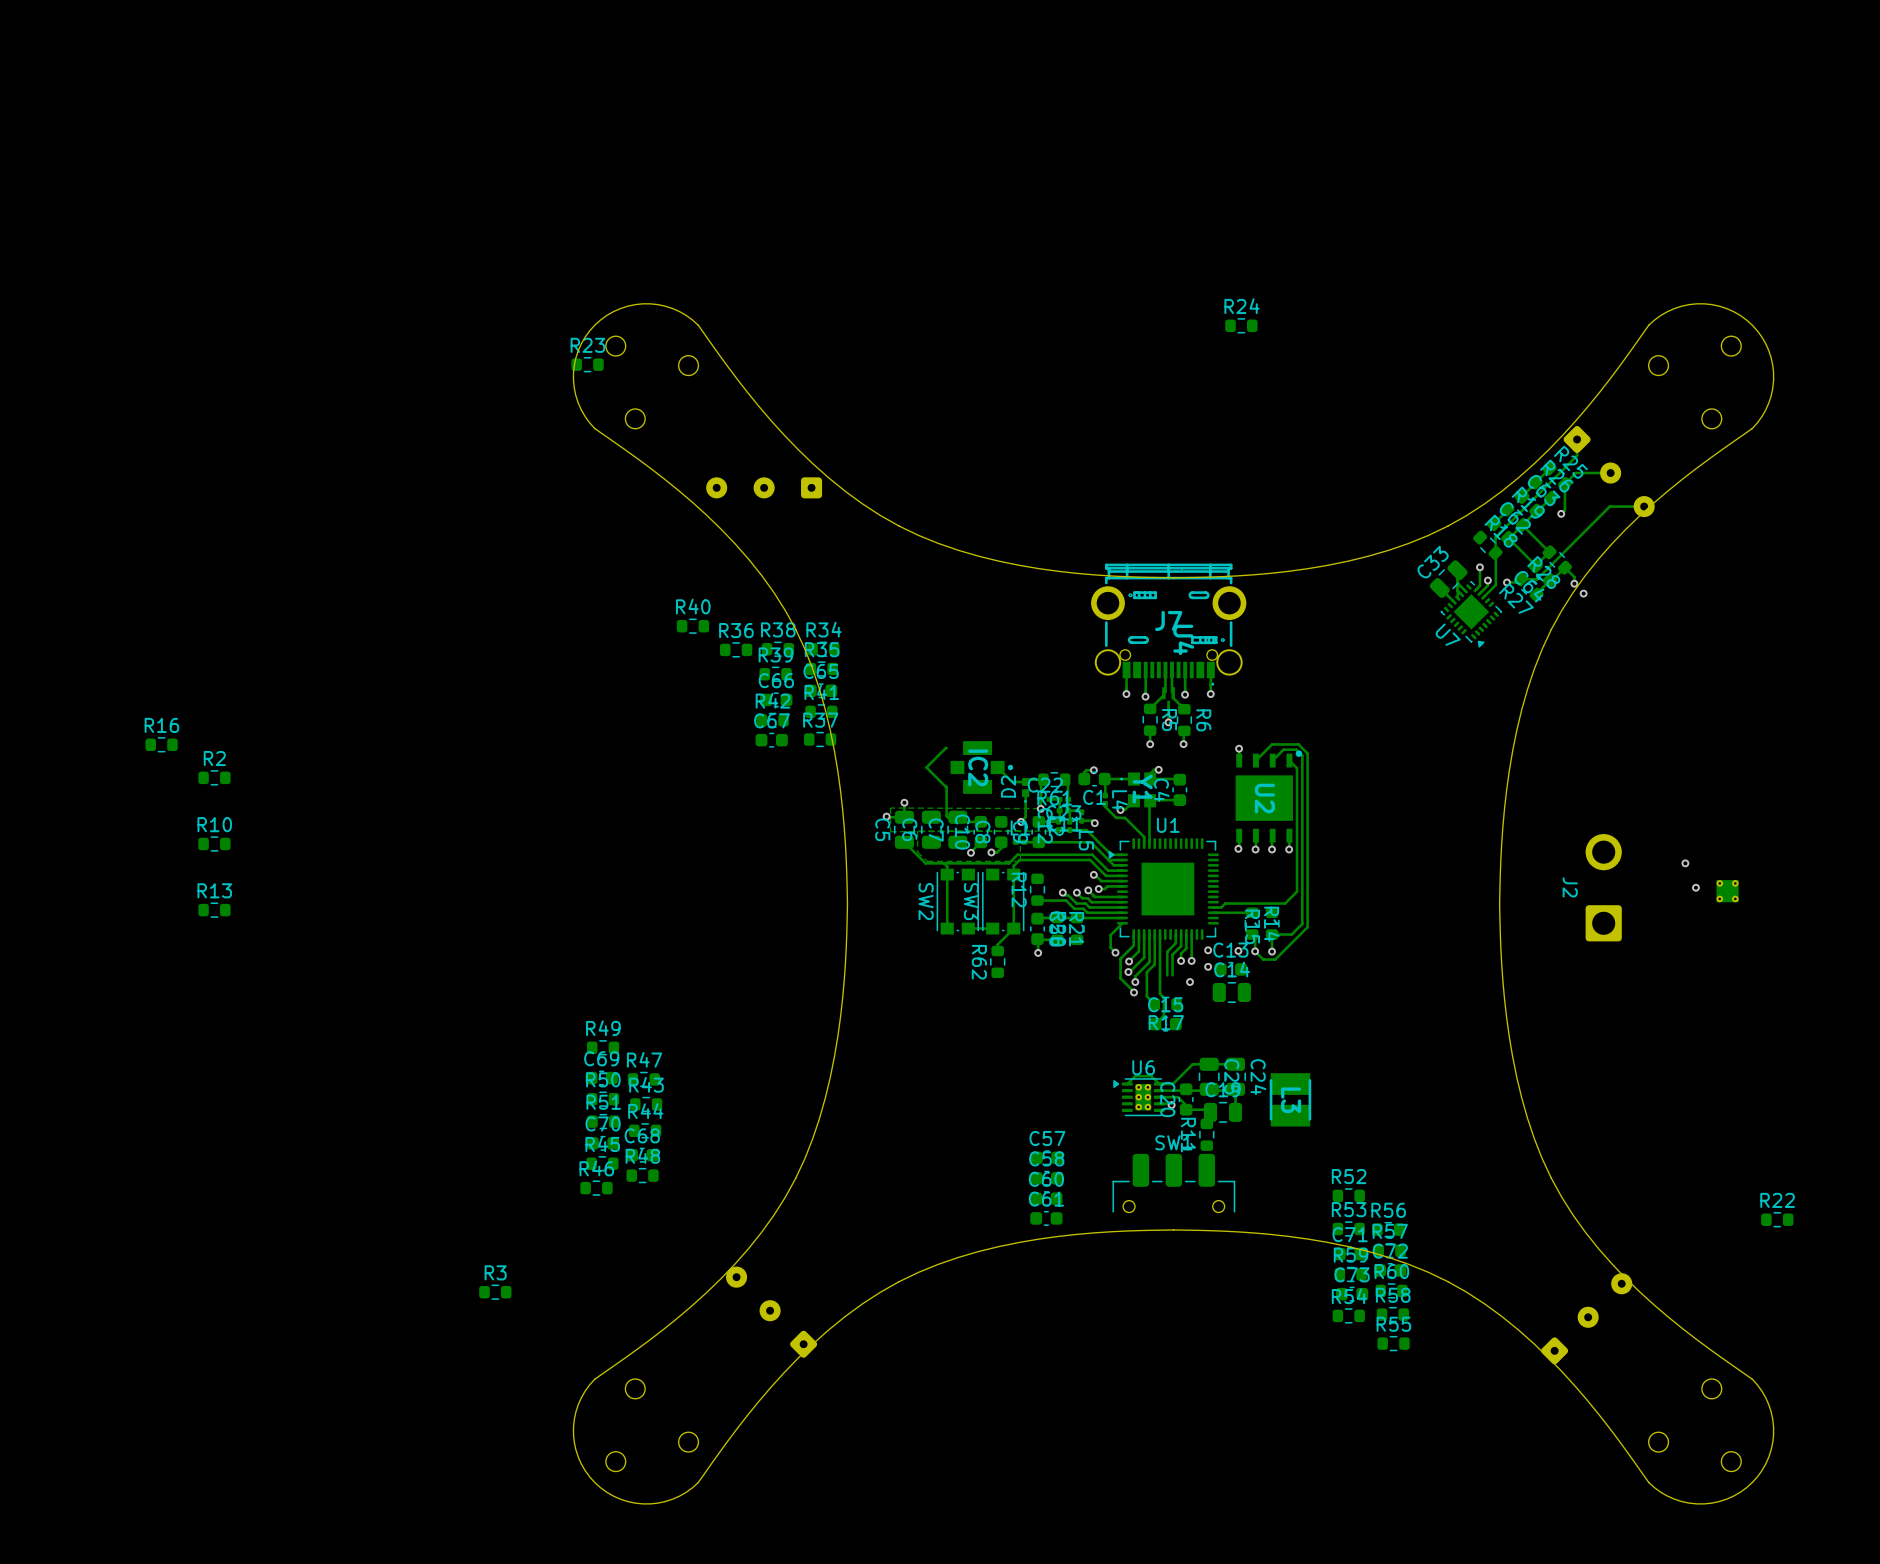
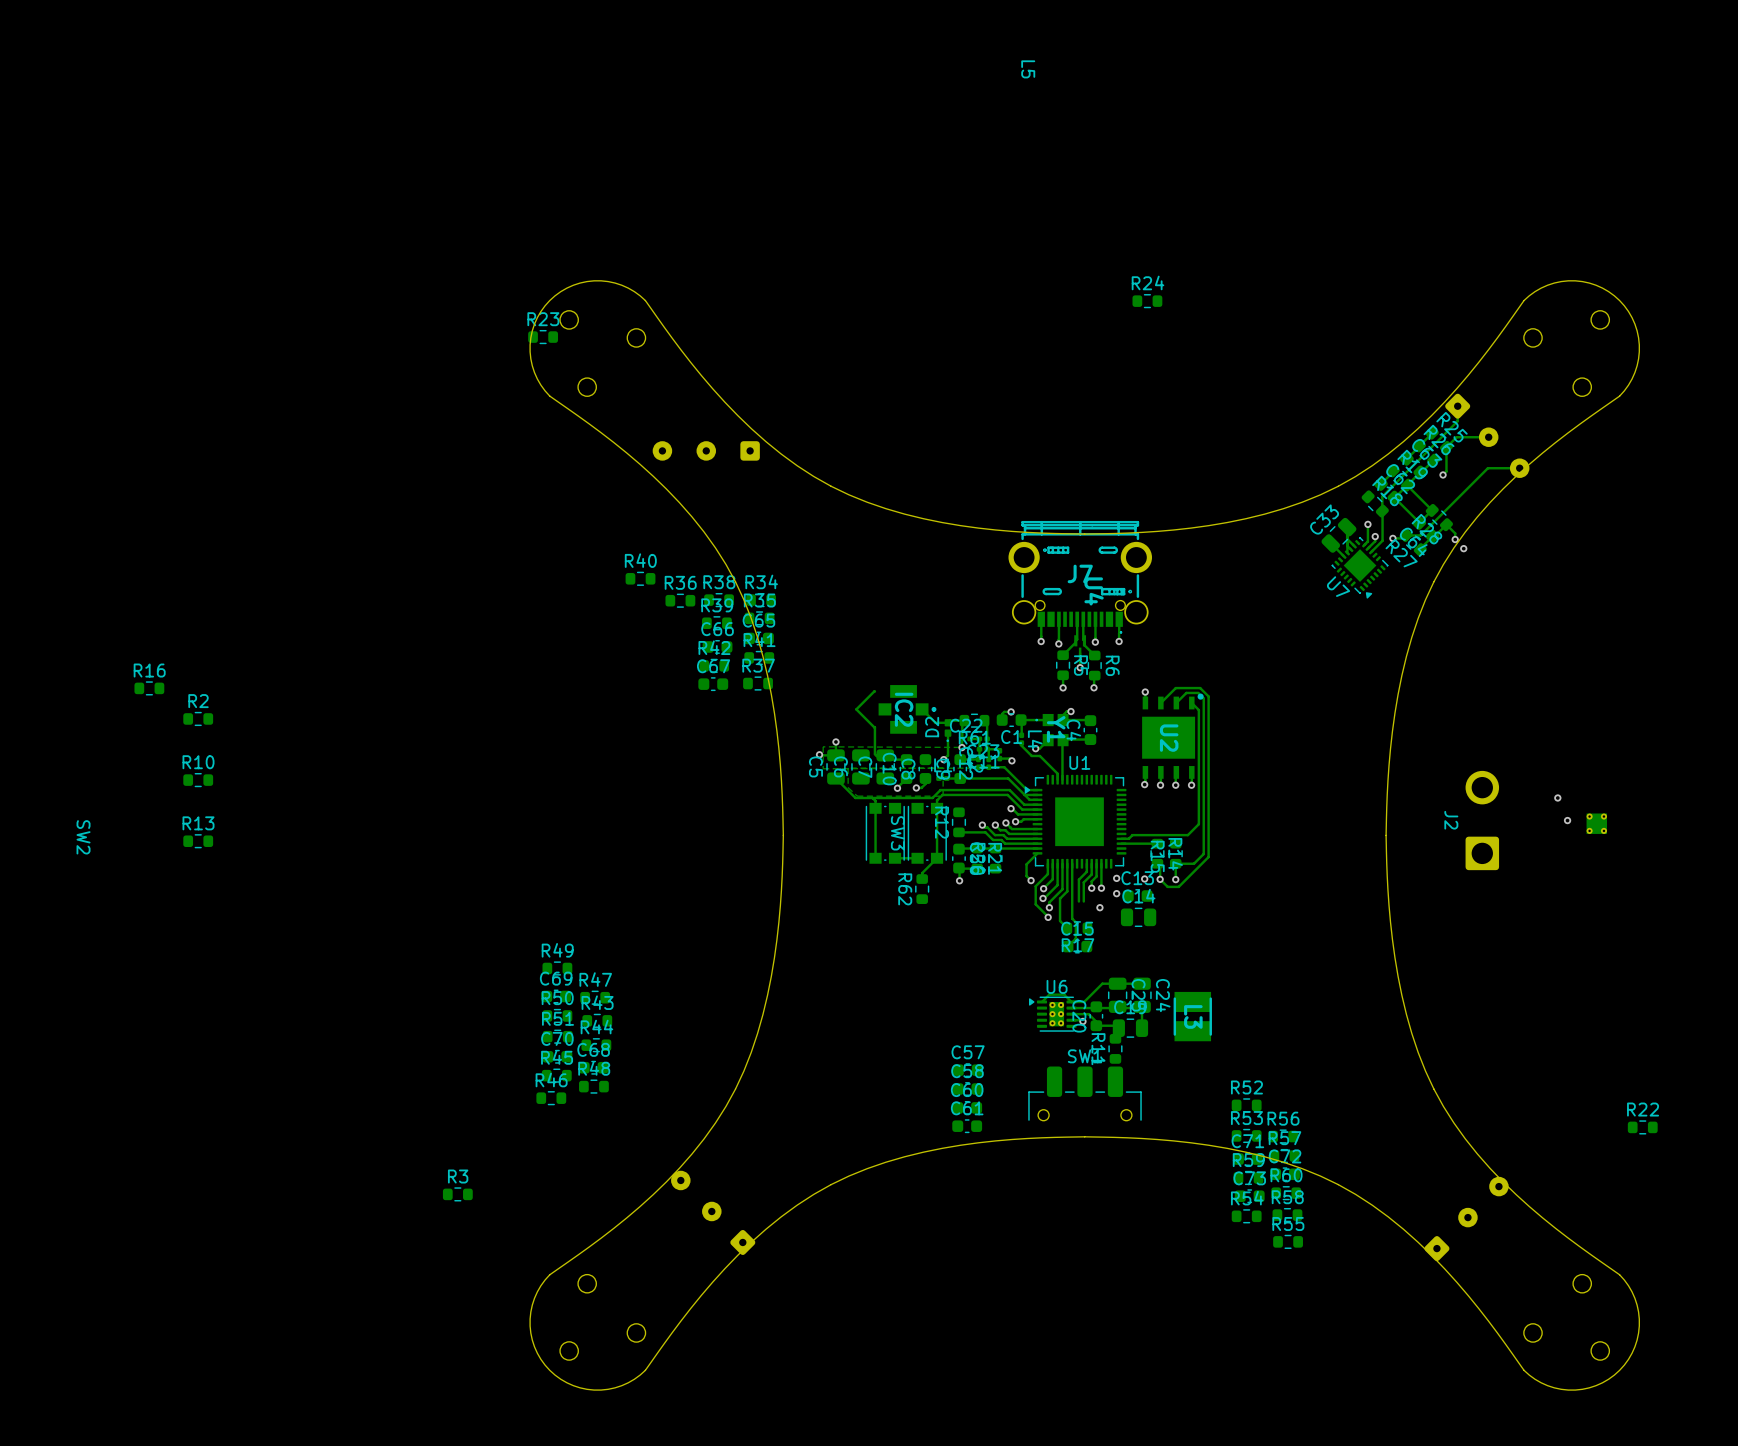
L5 name position: L5 (1086, 840) -> L5 (1028, 69)
SW2 name position: SW2 (926, 901) -> SW2 (83, 837)

